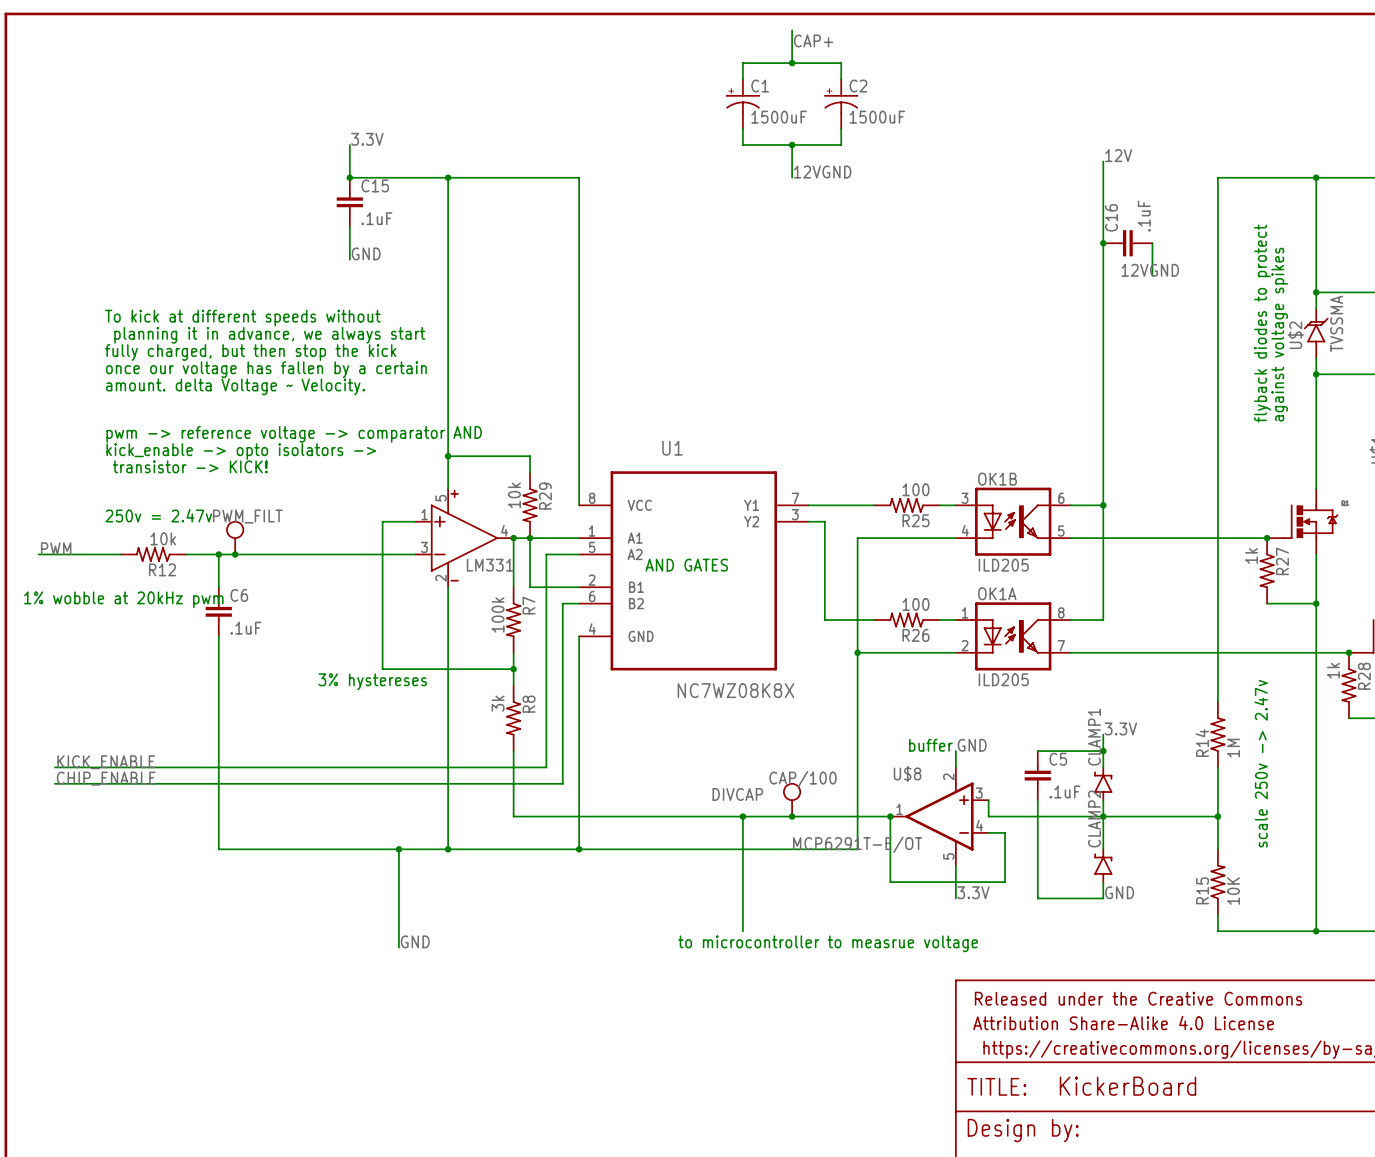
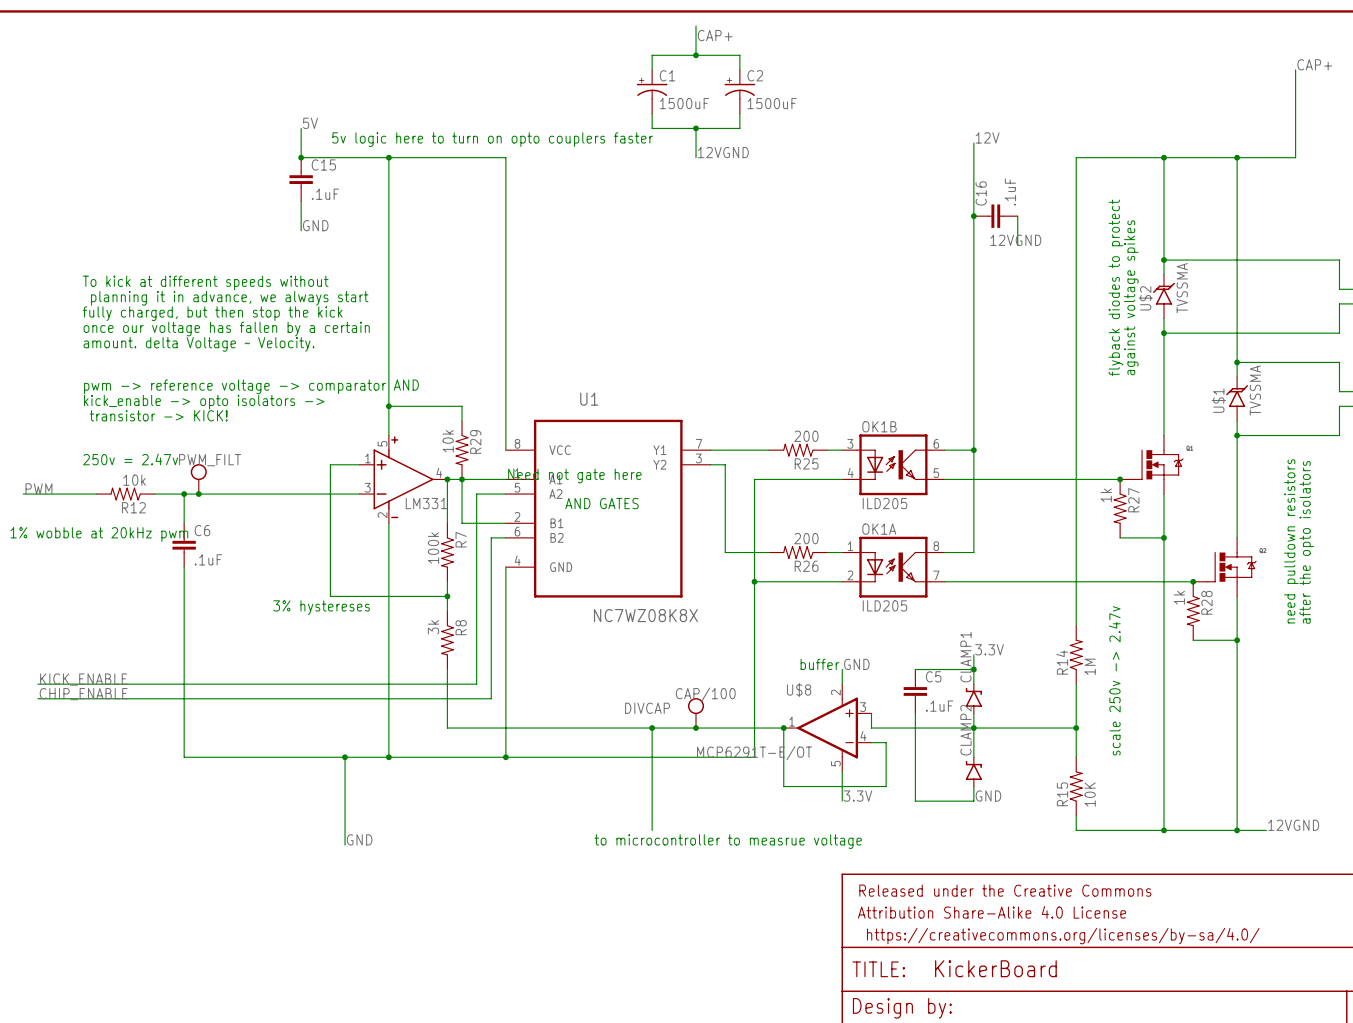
label: 3.3V (367, 139) -> 5V (310, 123)
text: none -> 5v logic here to turn on opto couplers faster (492, 139)
R25 value: 100 (915, 489) -> 200 (806, 436)
text: none -> Need not gate here (574, 476)
R26 value: 100 (915, 604) -> 200 (806, 538)

